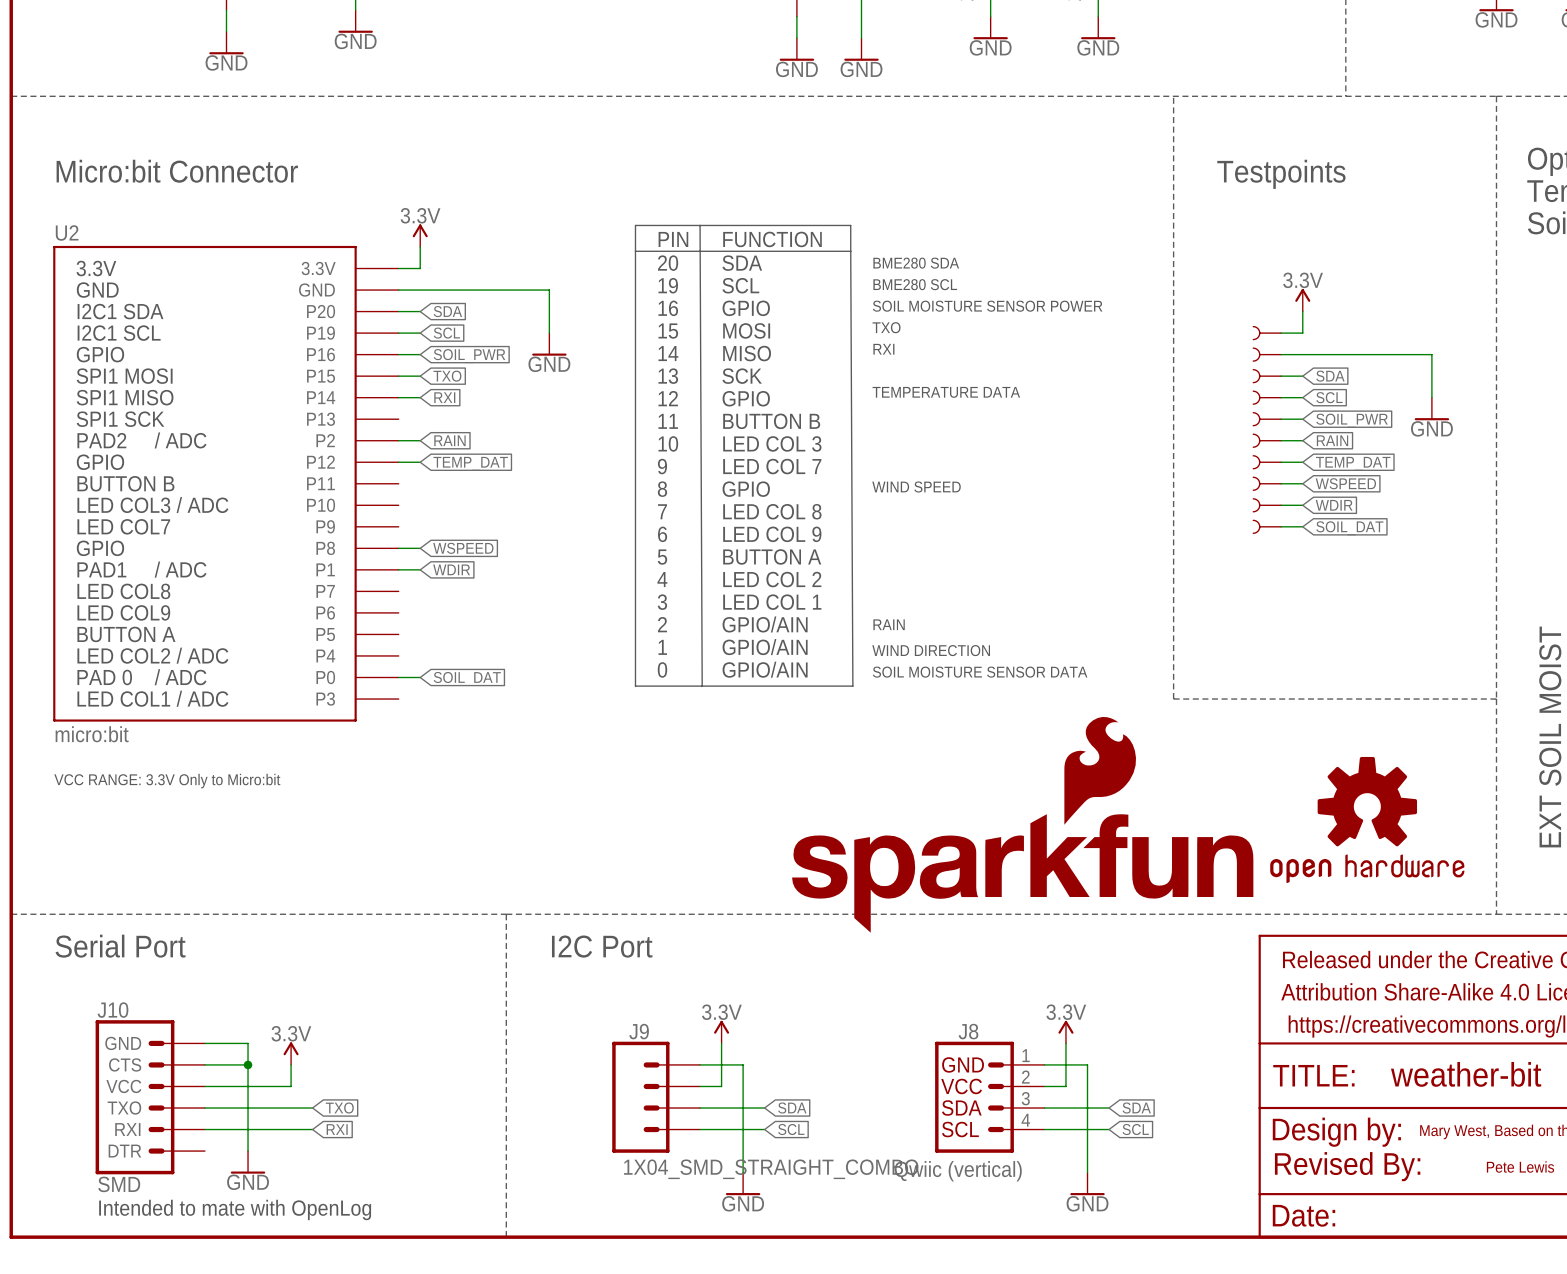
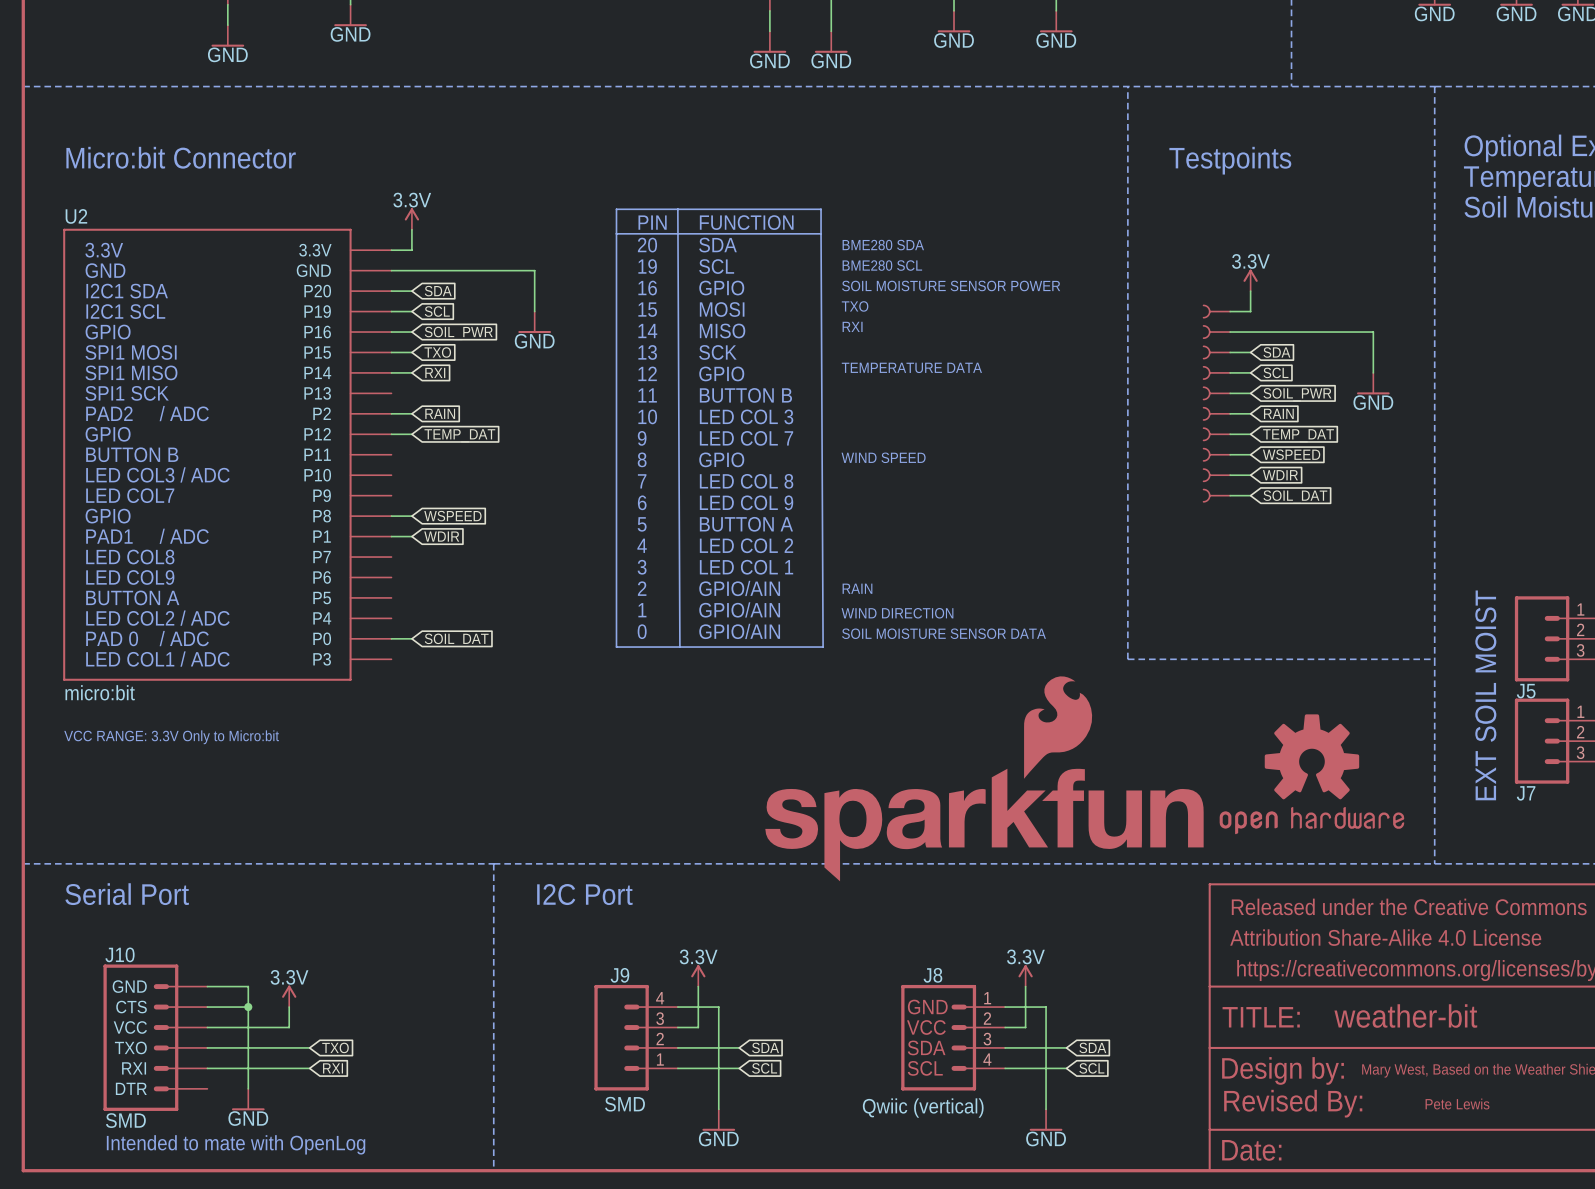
J9 pin number: none -> 4 (660, 998)
J9 pin number: none -> 3 (660, 1018)
J9 pin number: none -> 2 (660, 1039)
J9 pin number: none -> 1 (660, 1059)
J9 value: 1X04_SMD_STRAIGHT_COMBO (771, 1169) -> SMD (625, 1104)

